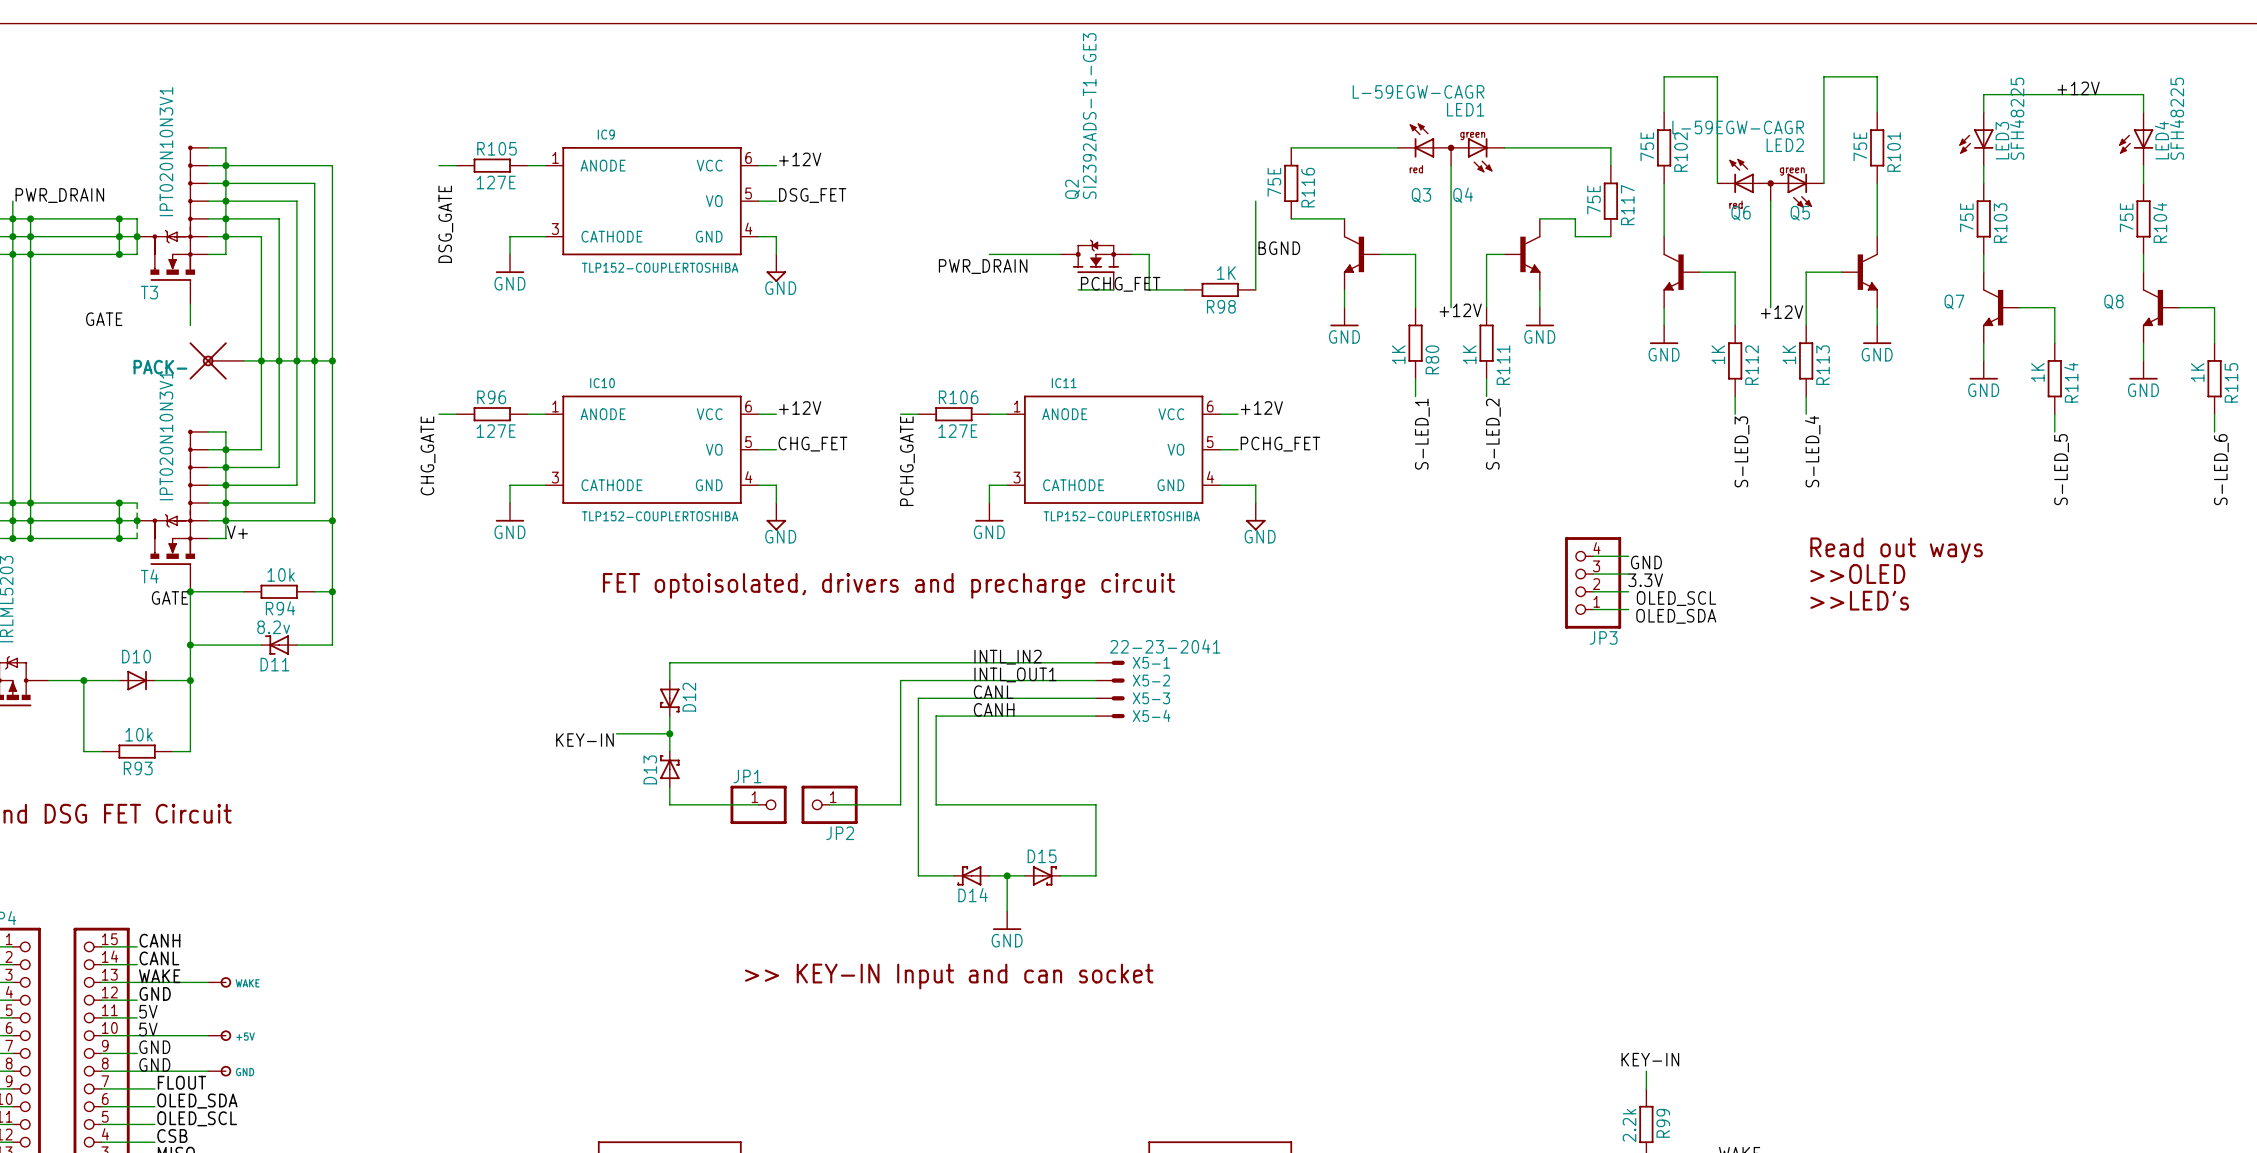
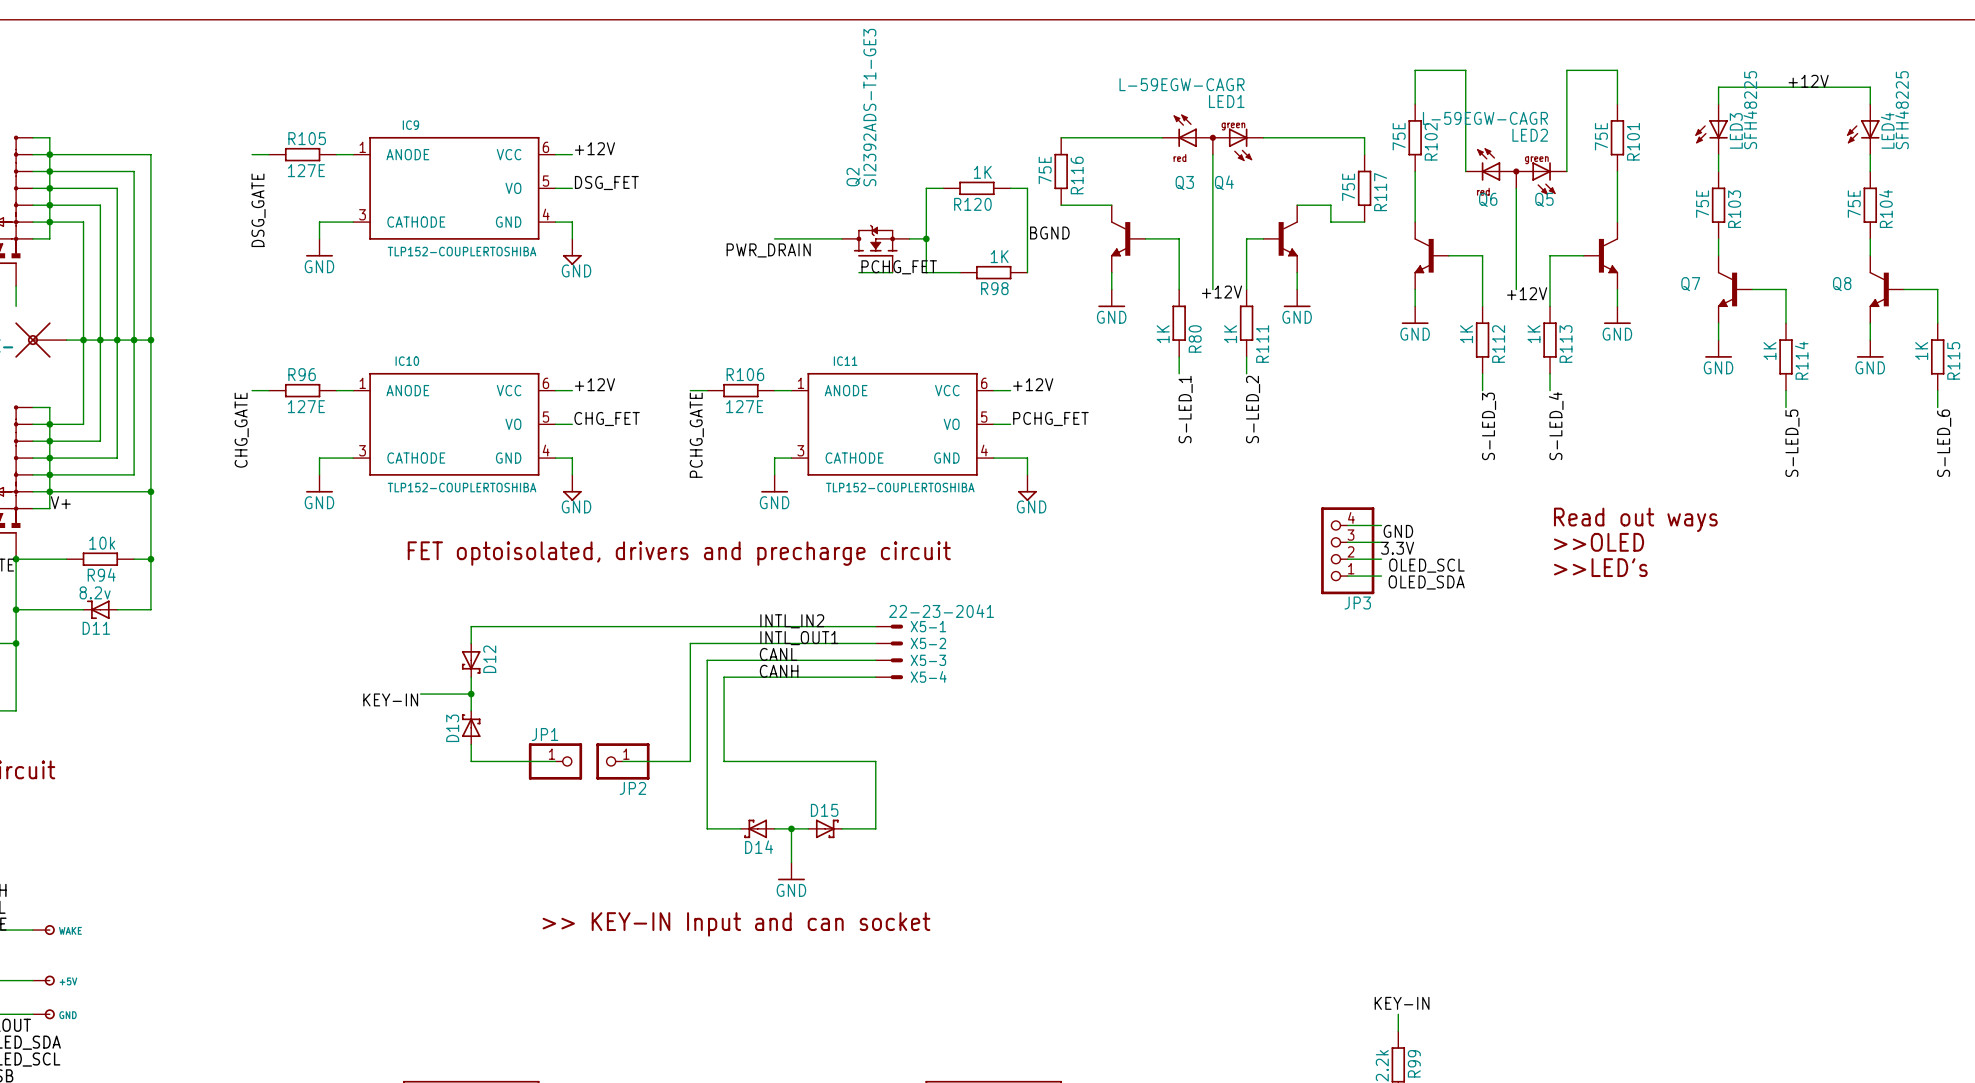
wire: none -> (943, 188) (926, 188) (926, 238)
R120: none -> 1K (976, 188)
wire: none -> (1010, 188) (1027, 188)
junction: none -> (926, 238)

